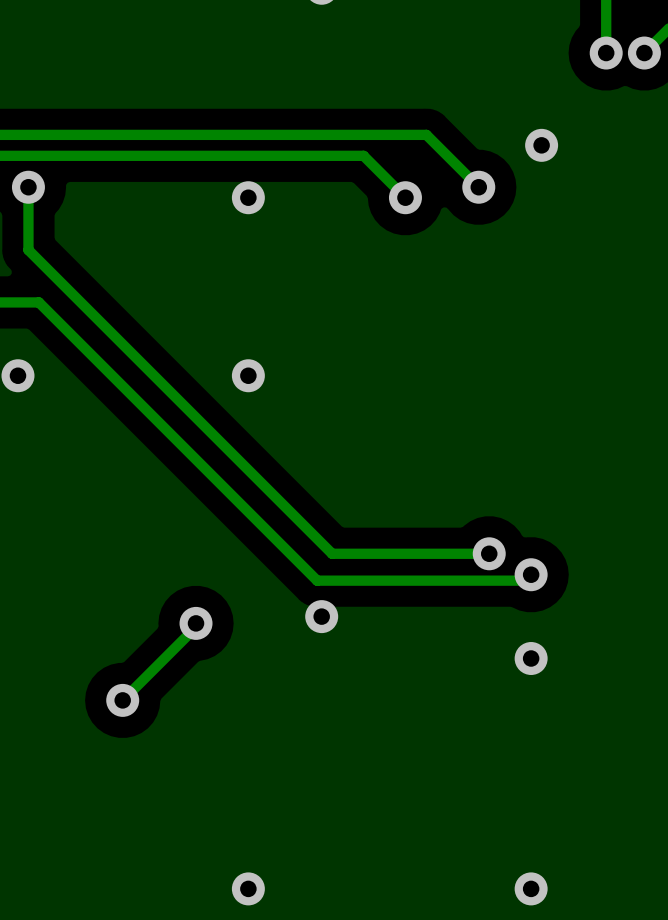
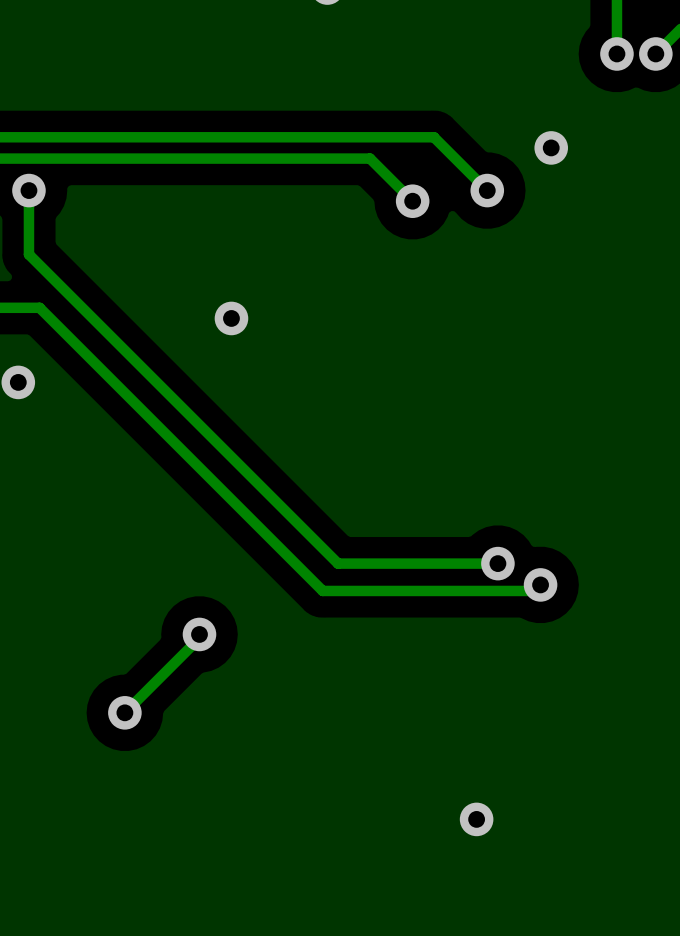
via: (248, 197) -> none
via: none -> (231, 318)
via: (248, 375) -> none
via: (321, 616) -> none
via: (531, 658) -> none
via: none -> (476, 819)
via: (248, 888) -> none
via: (531, 888) -> none

